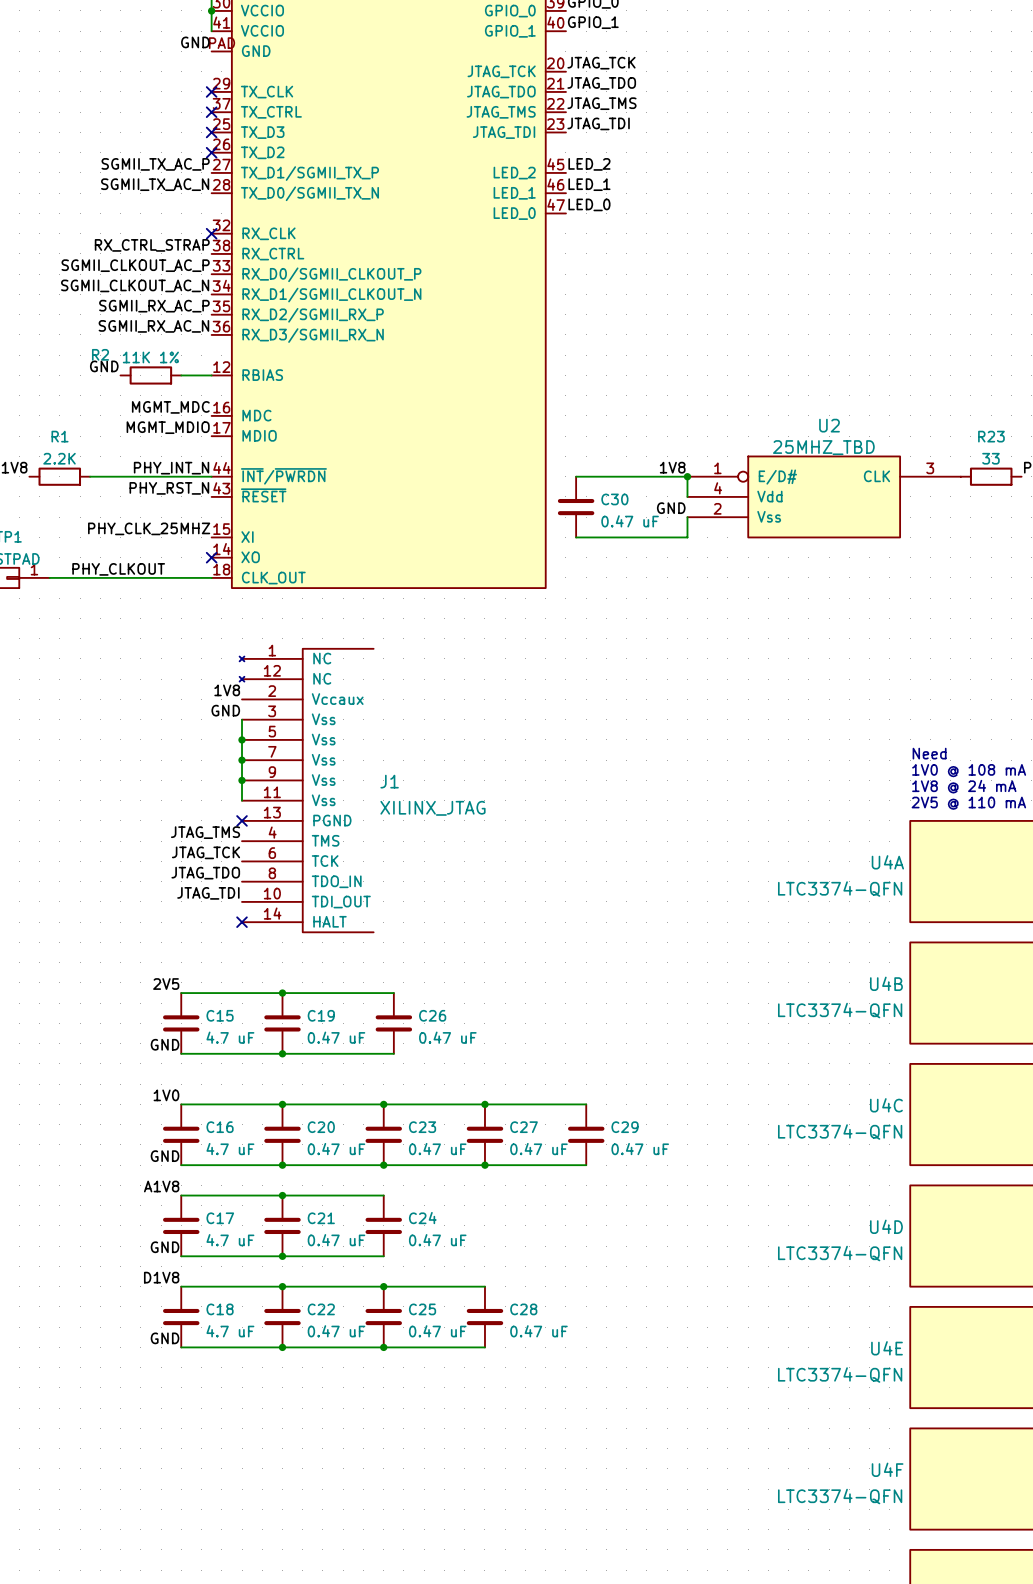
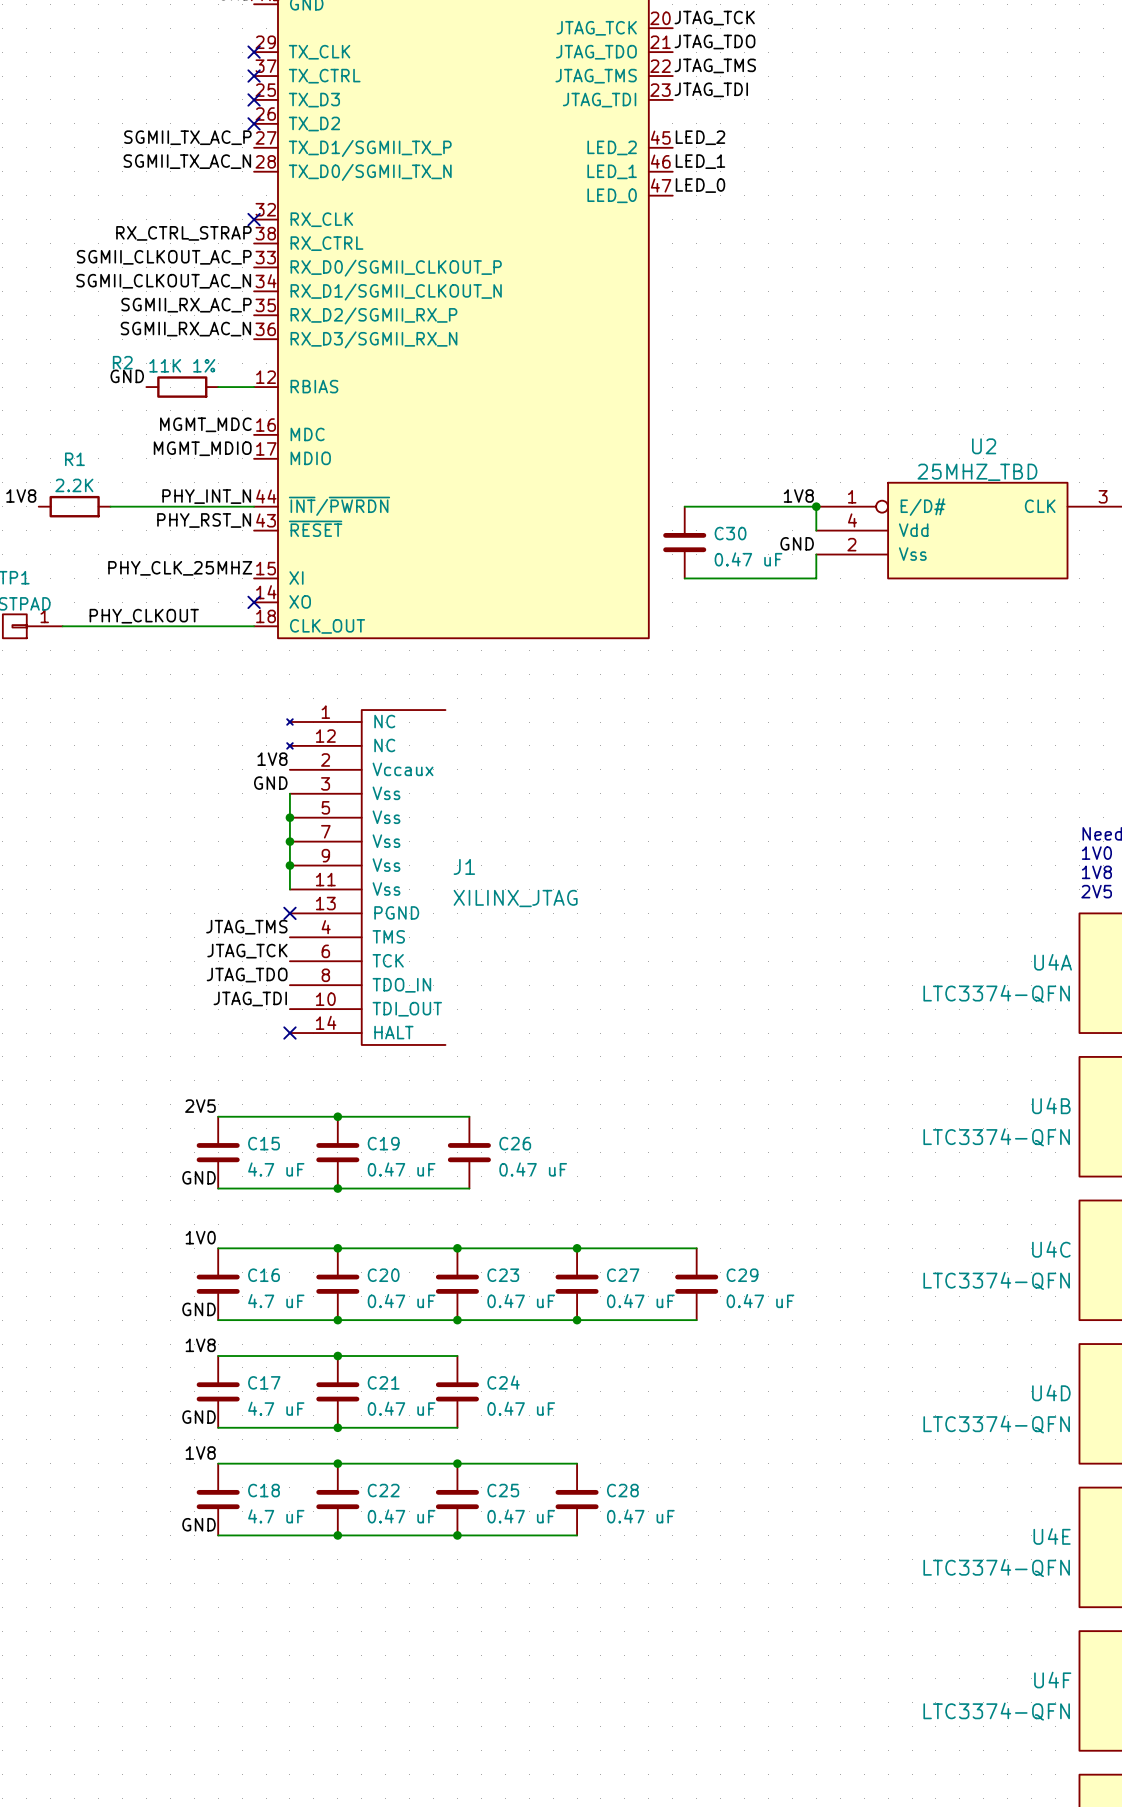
label: A1V8 (161, 1186) -> 1V8 (200, 1345)
label: D1V8 (161, 1277) -> 1V8 (200, 1452)

